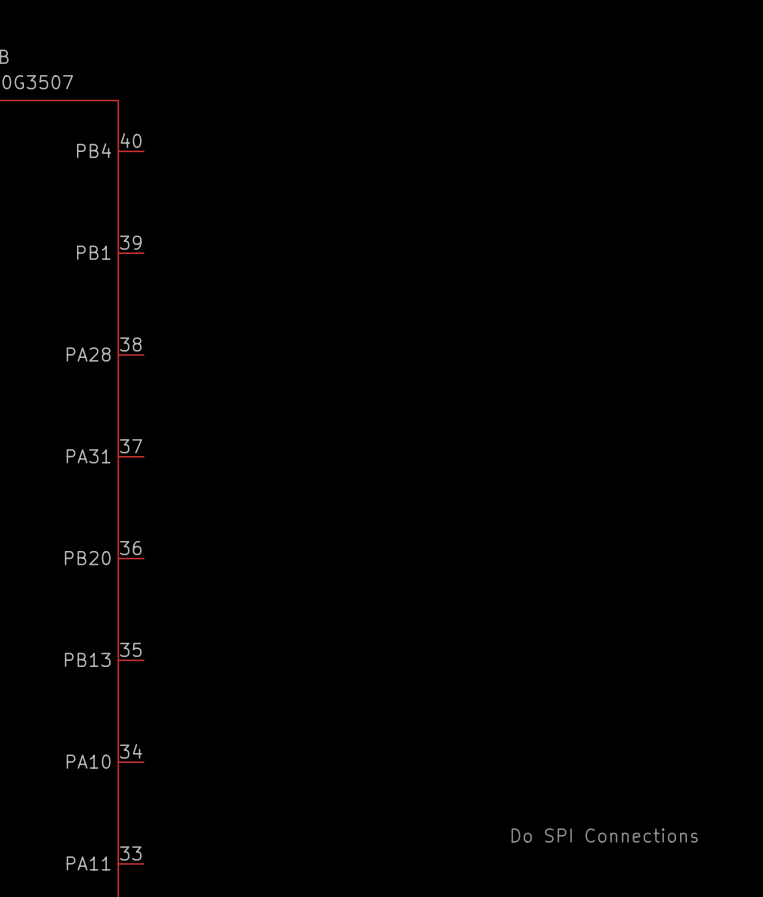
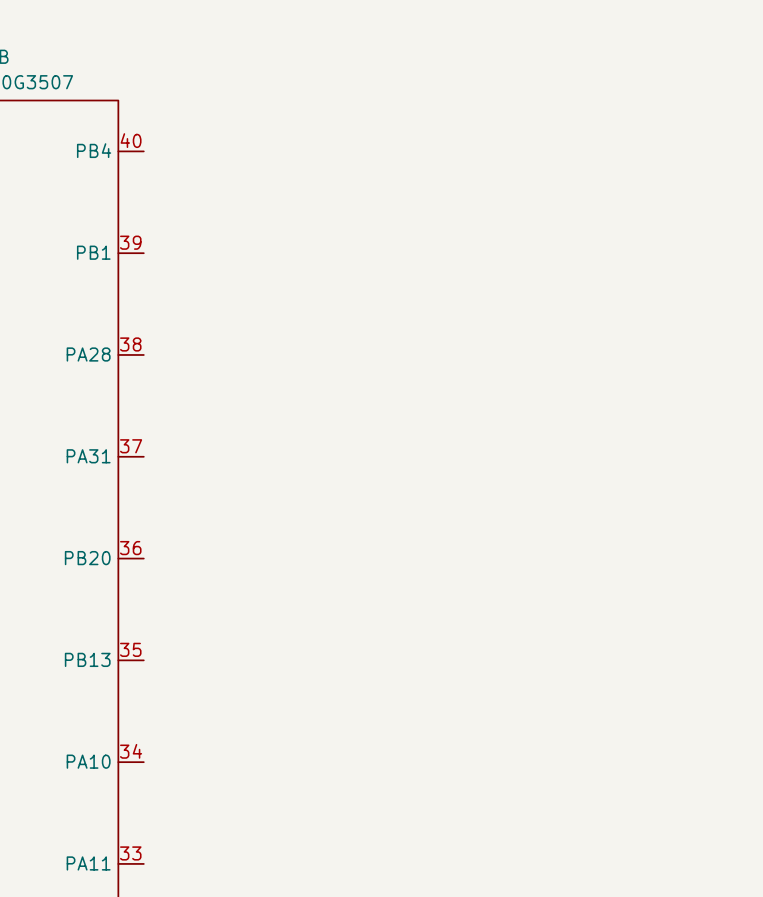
text: Do SPI Connections (604, 835) -> none

